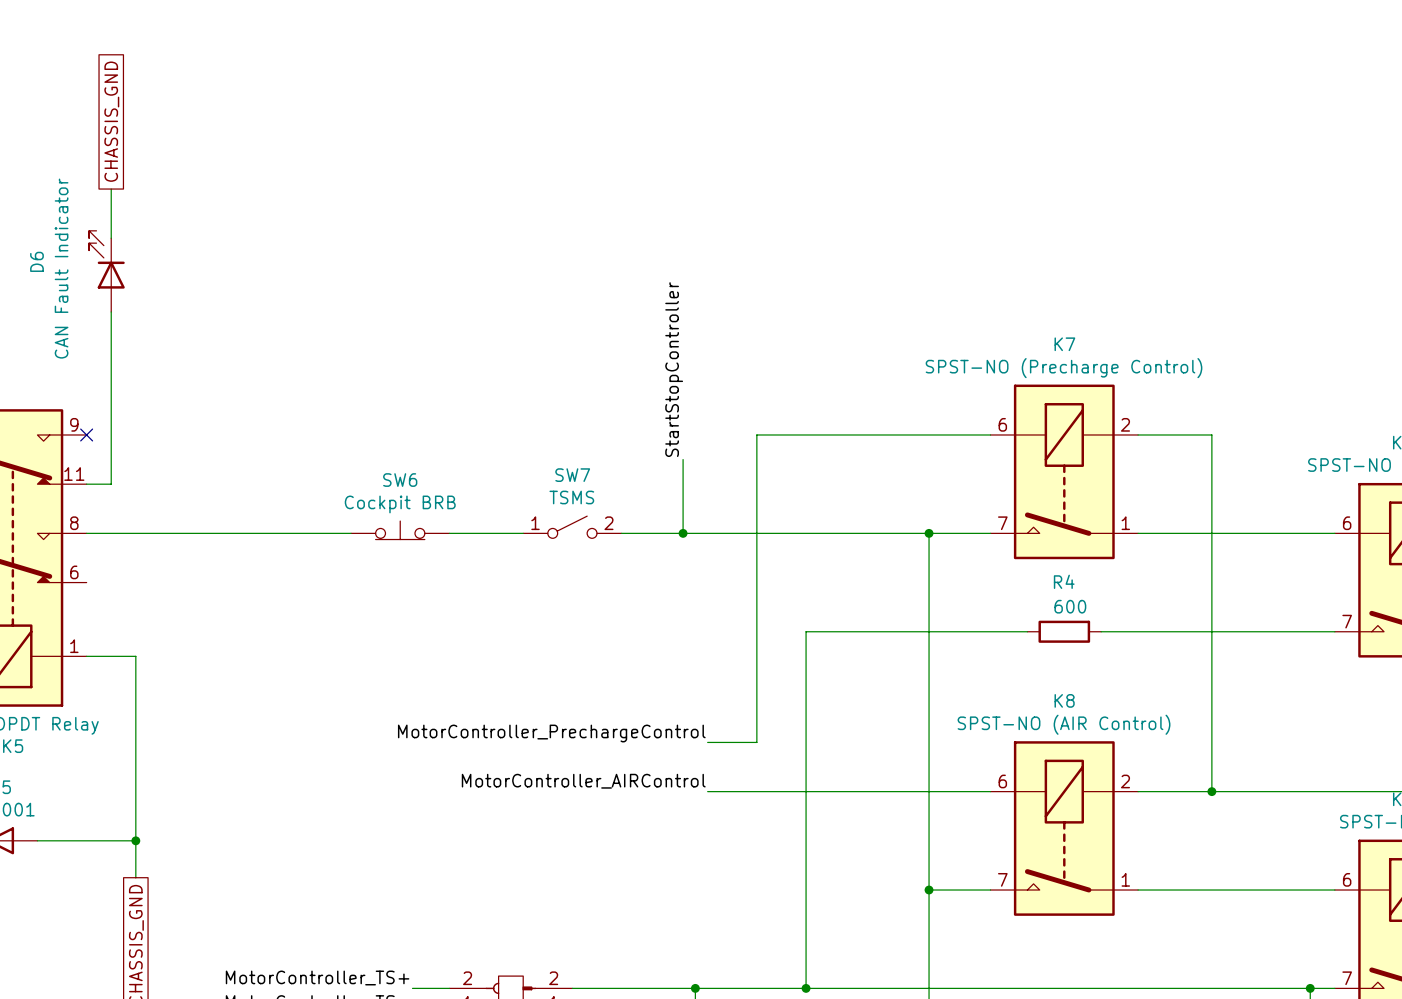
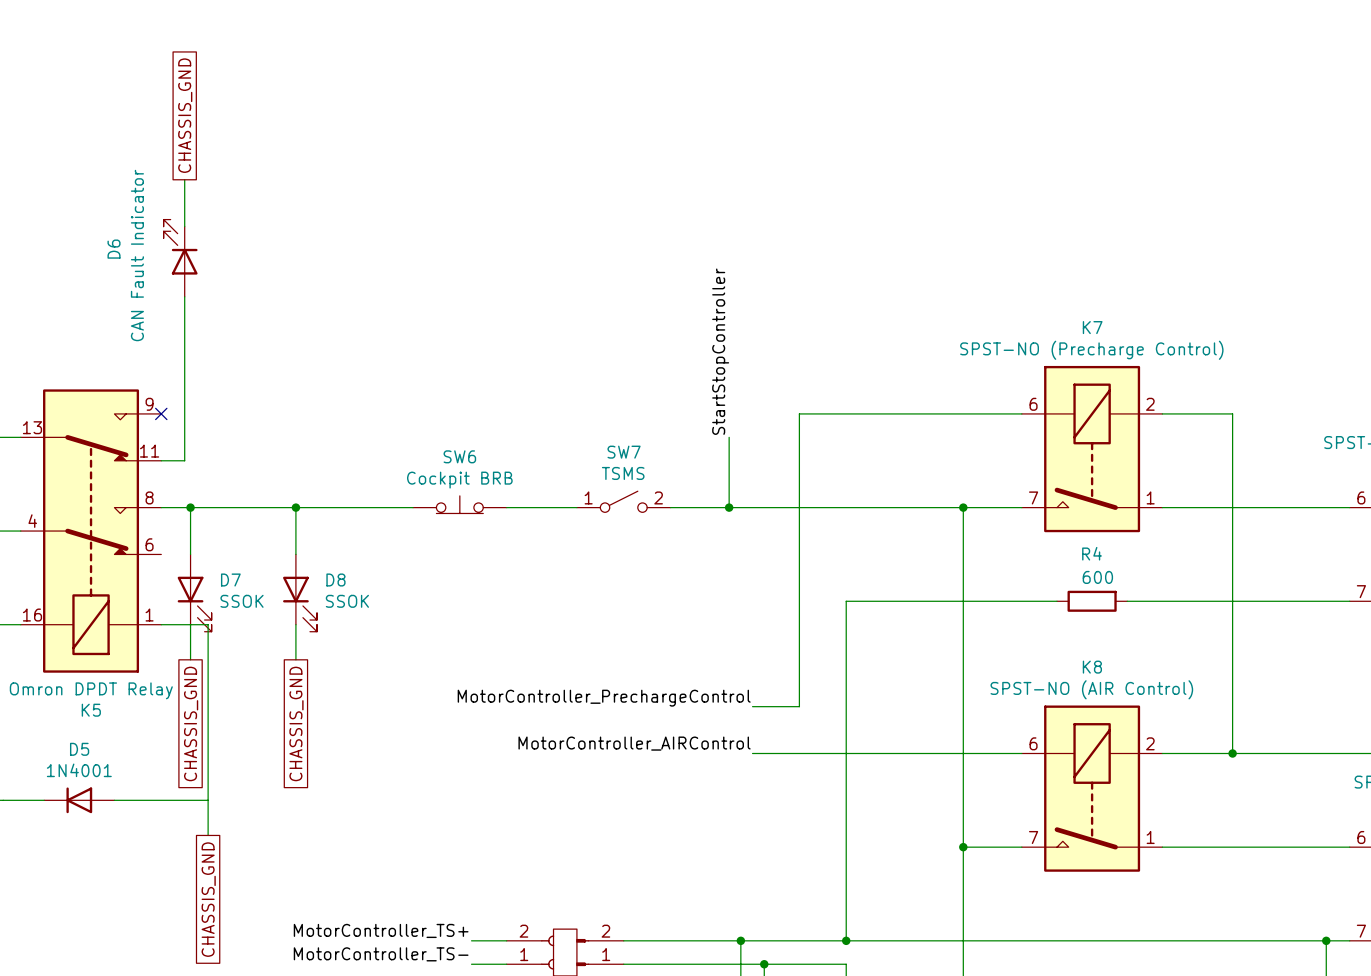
wire: none -> (190, 507) (190, 554)
junction: none -> (190, 507)
wire: none -> (295, 507) (295, 554)
junction: none -> (295, 507)
D7: none -> SSOK (194, 593)
D8: none -> SSOK (300, 593)
wire: none -> (190, 624) (190, 659)
wire: none -> (295, 624) (295, 659)
global label: none -> CHASSIS_GND (191, 723)
global label: none -> CHASSIS_GND (296, 723)
junction: (135, 840) -> none

